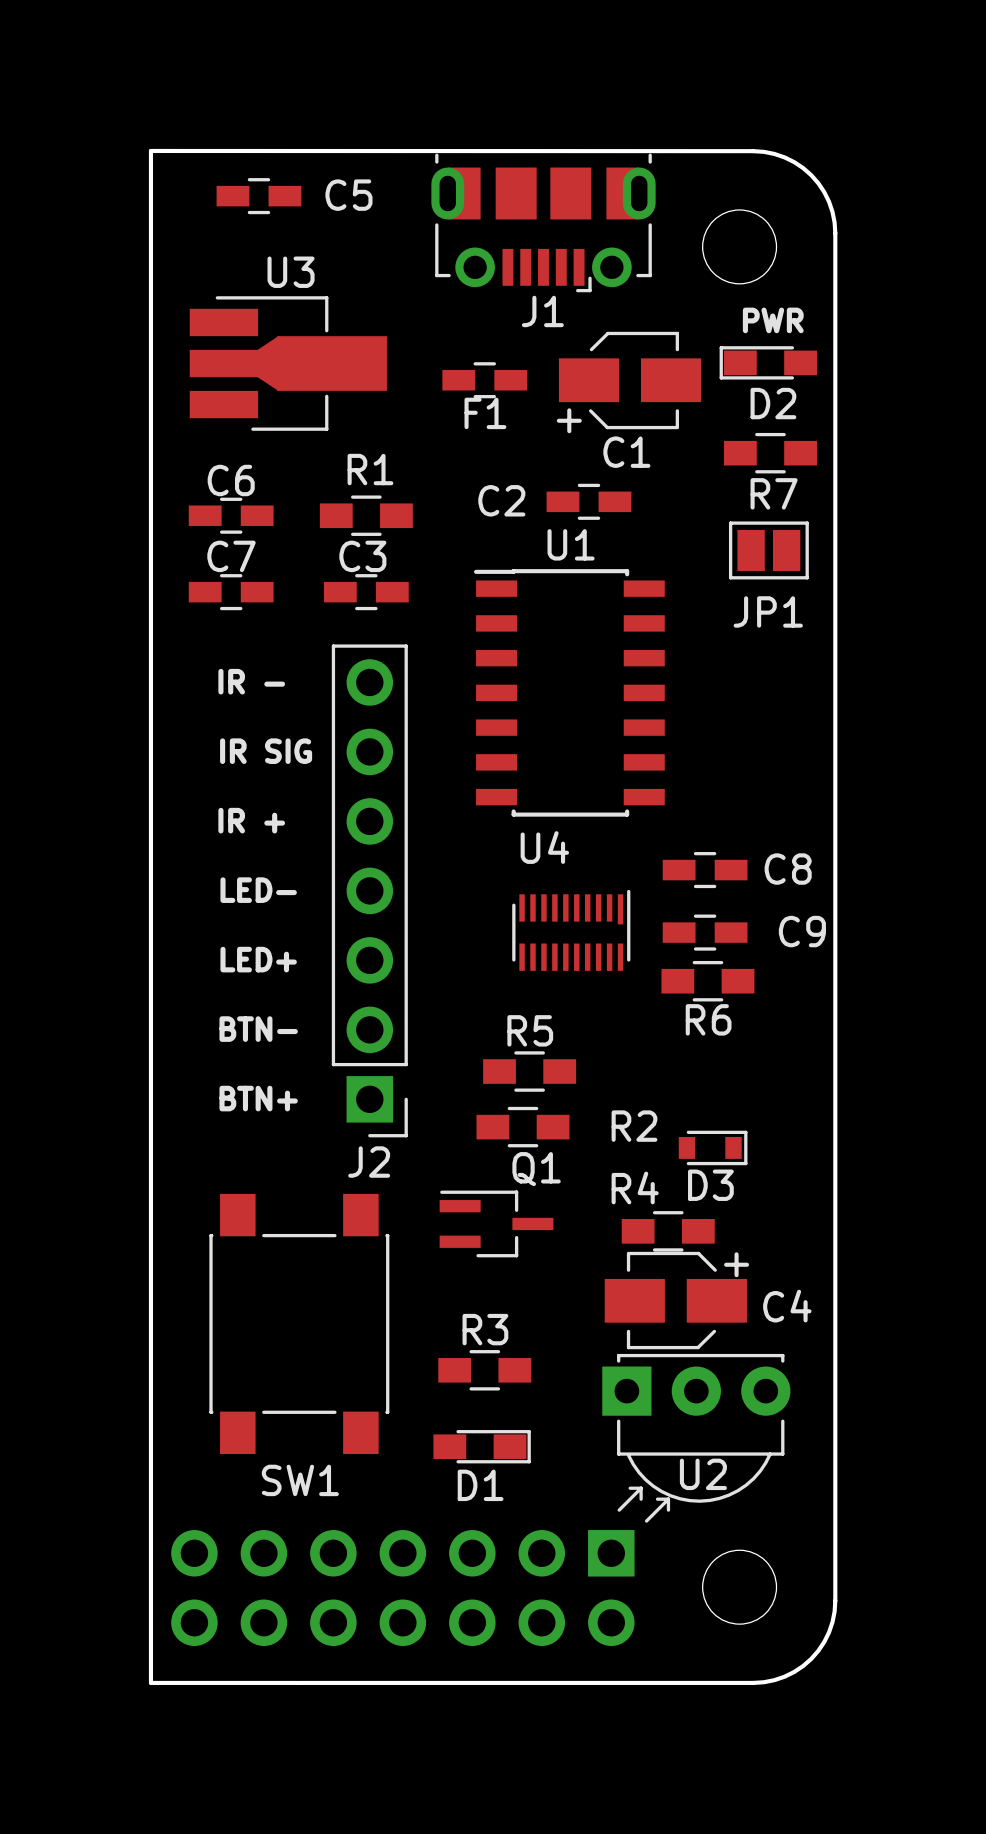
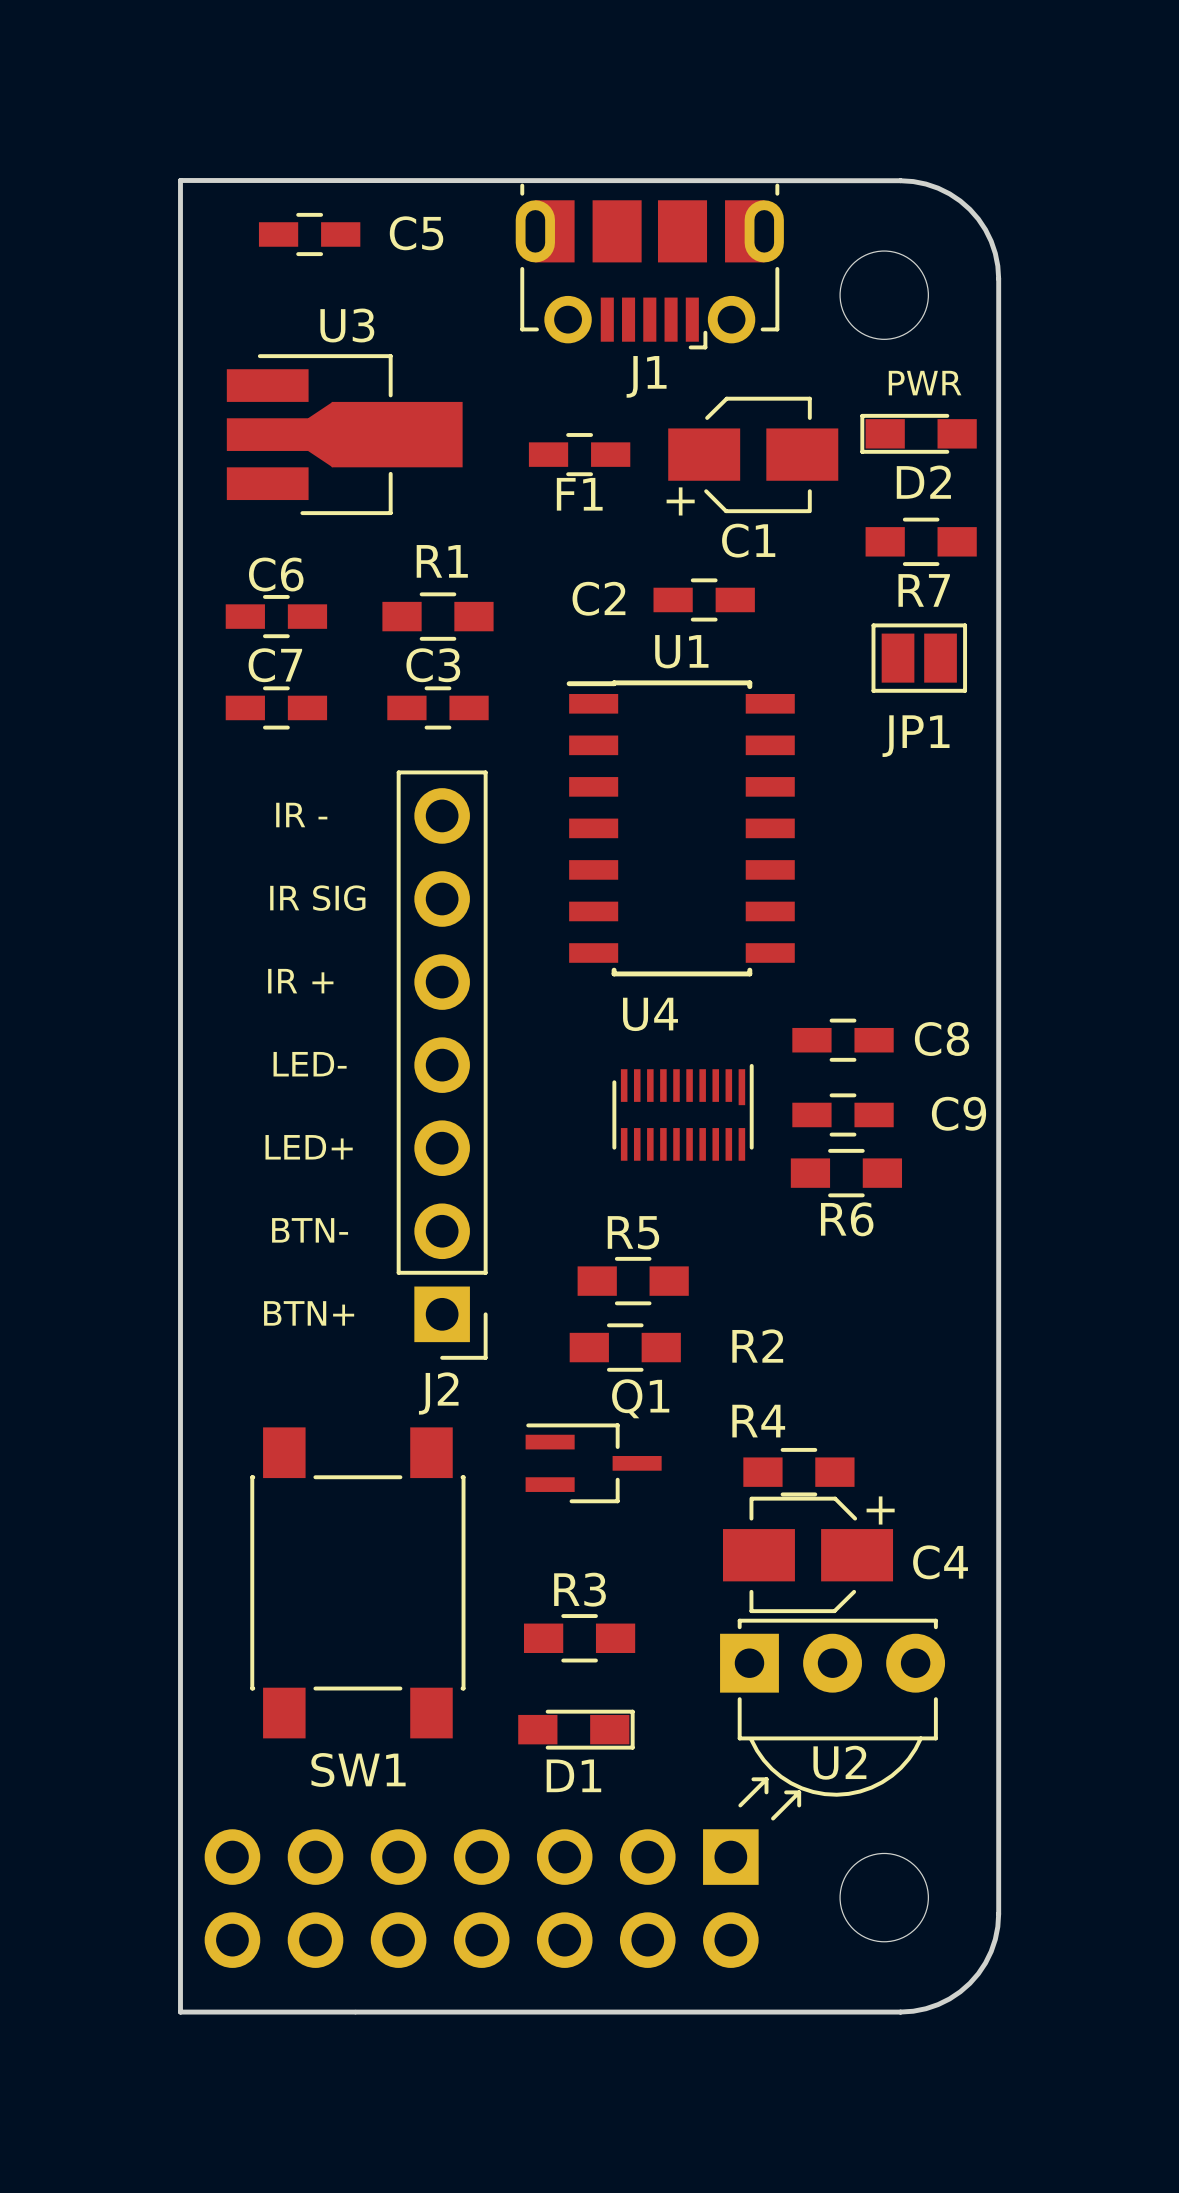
D3: (713, 1147) -> none

